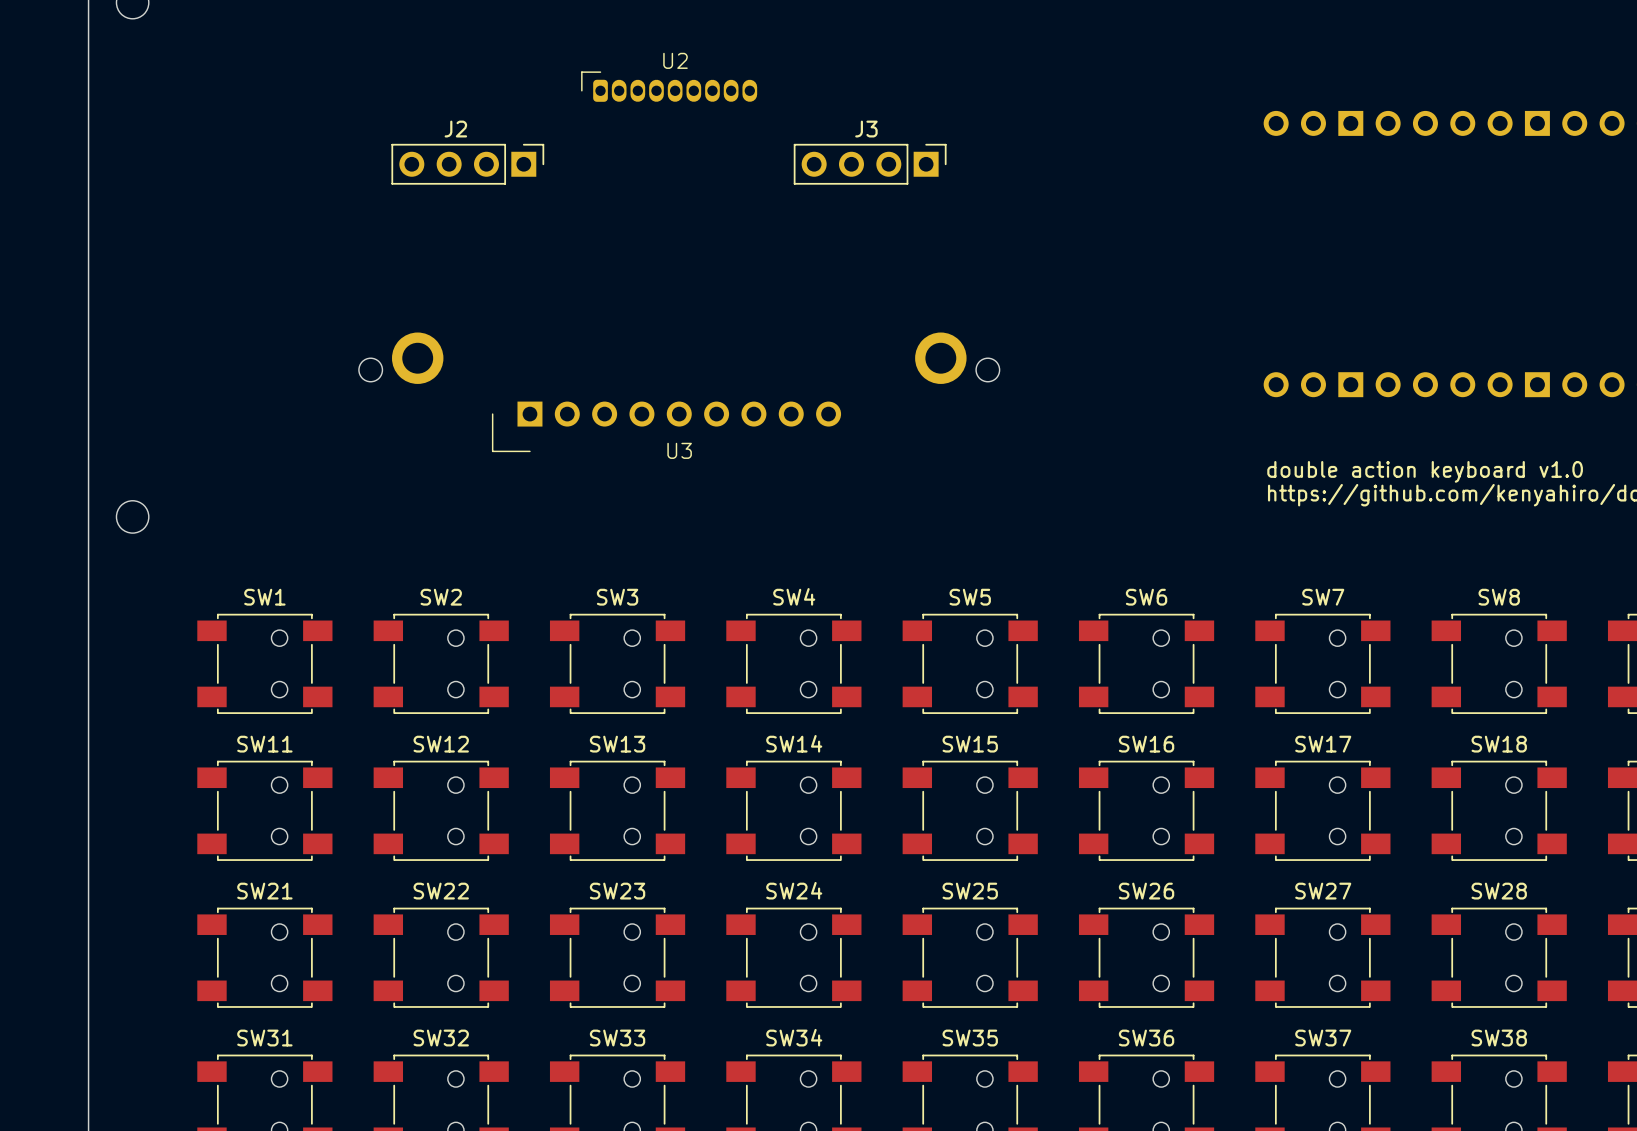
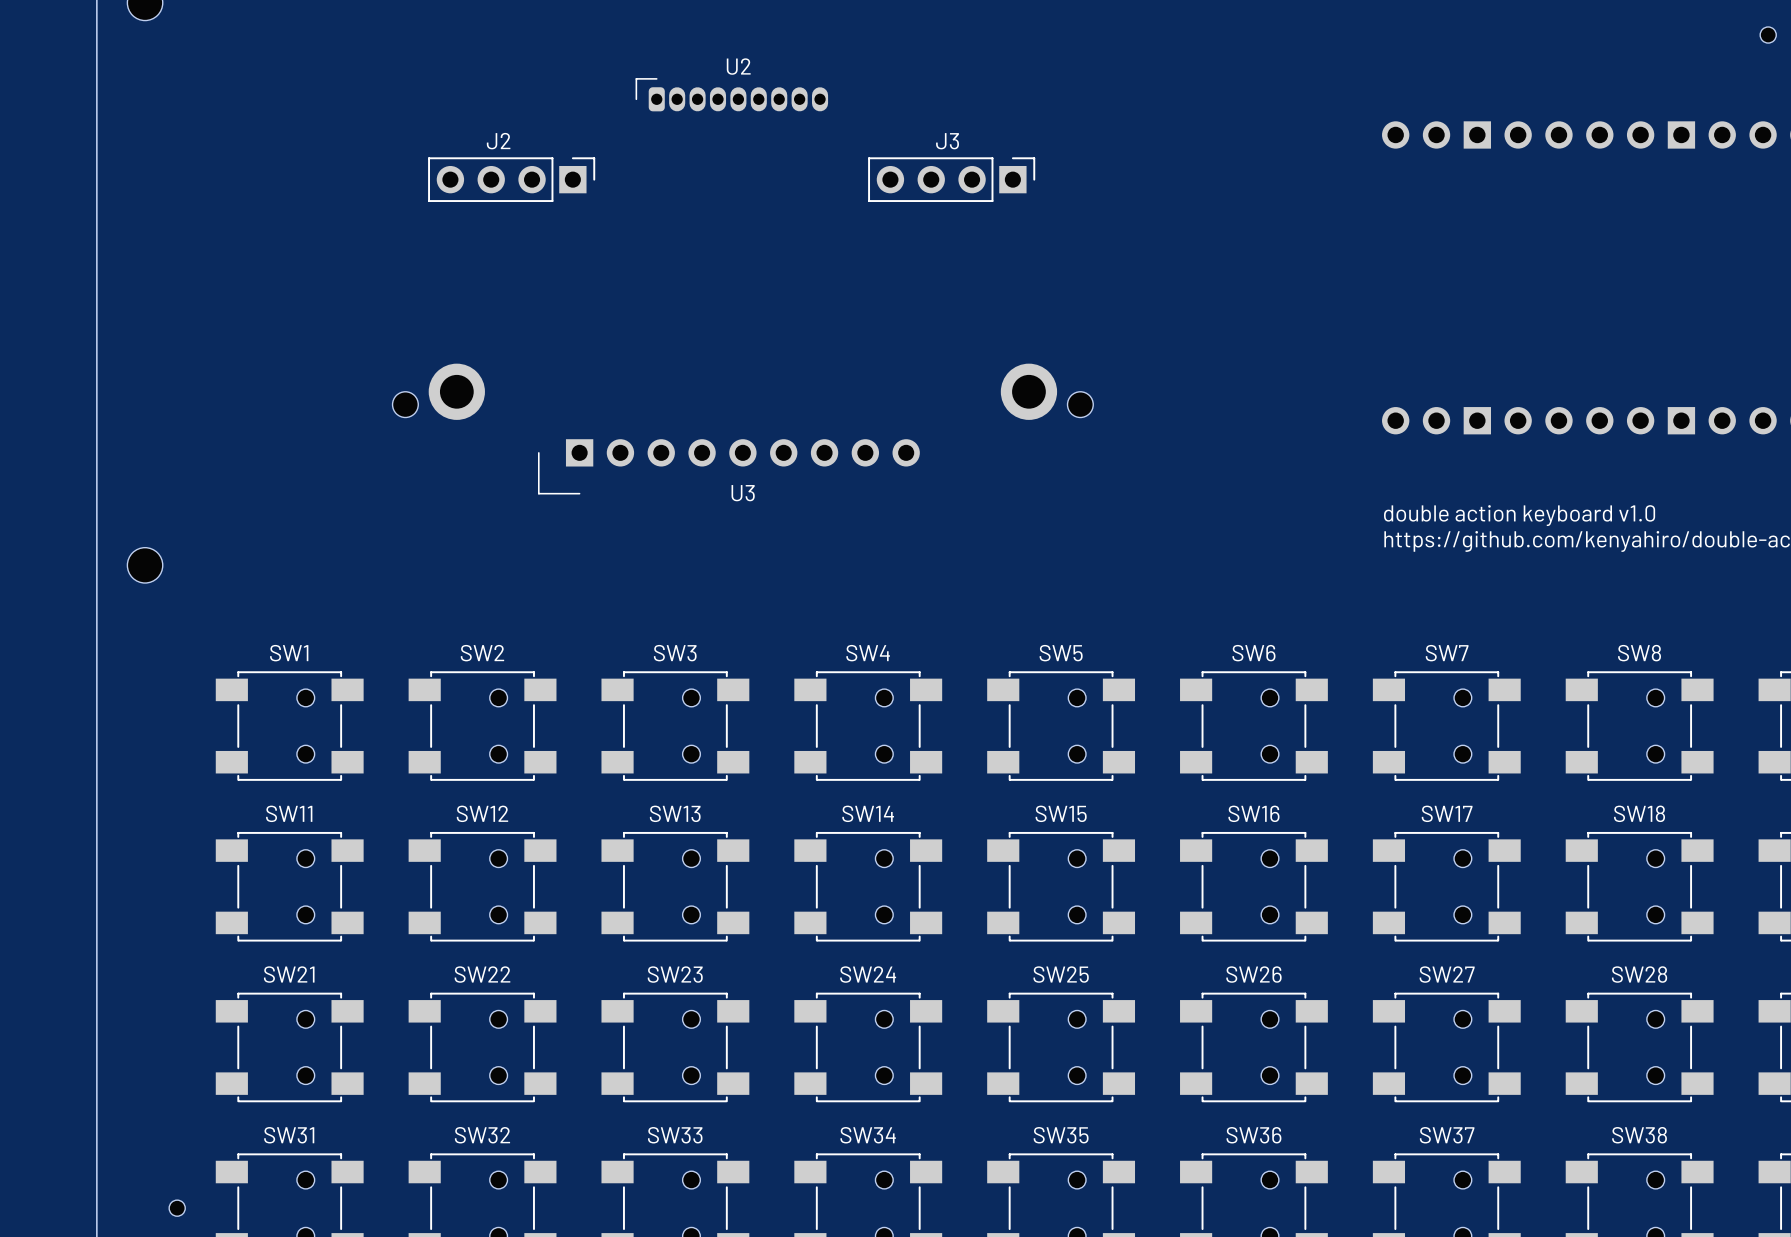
part: none -> (1768, 35)
part: none -> (177, 1208)

